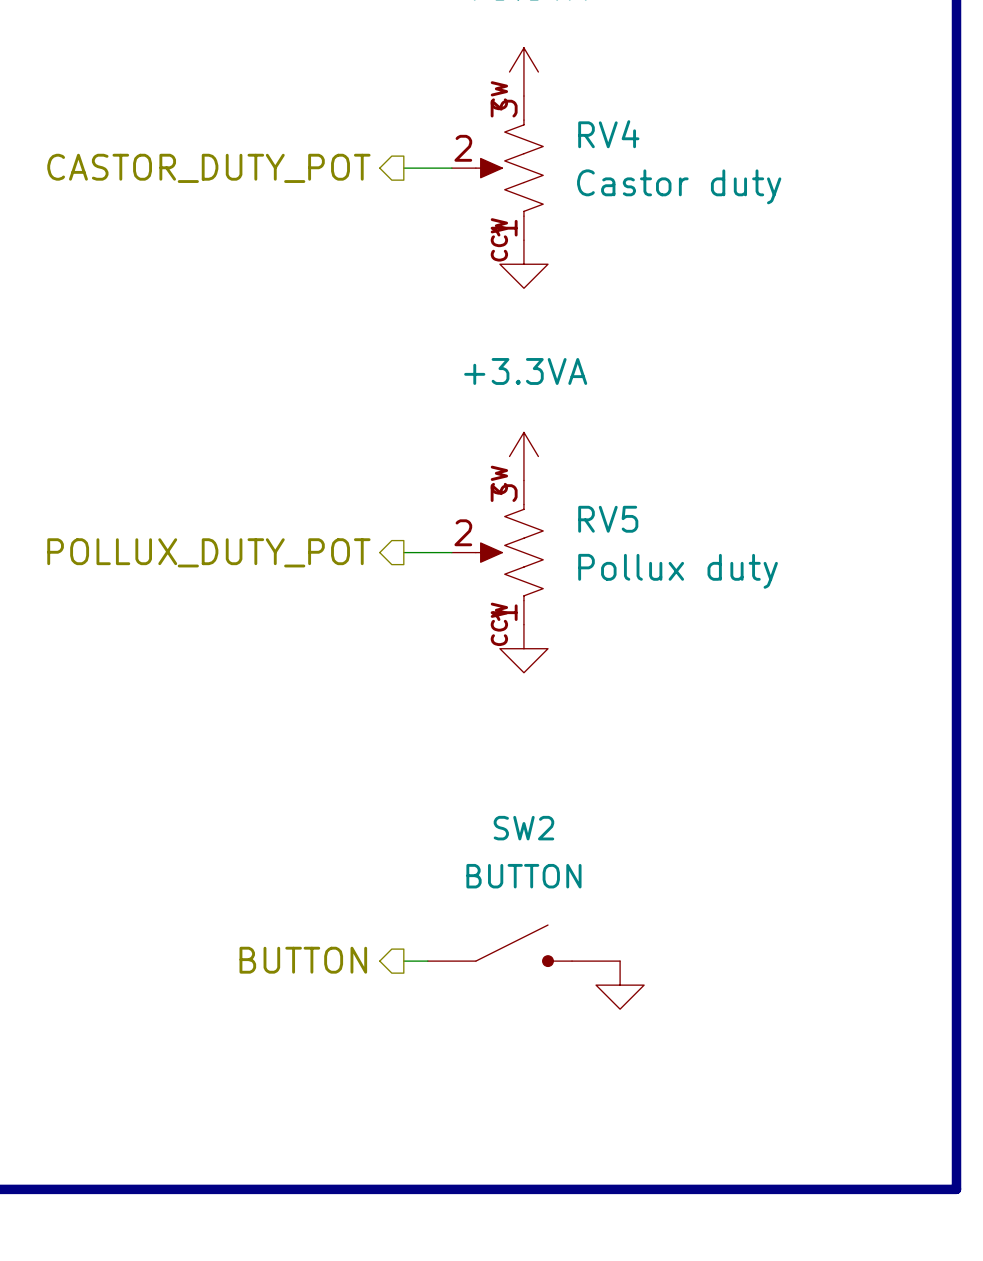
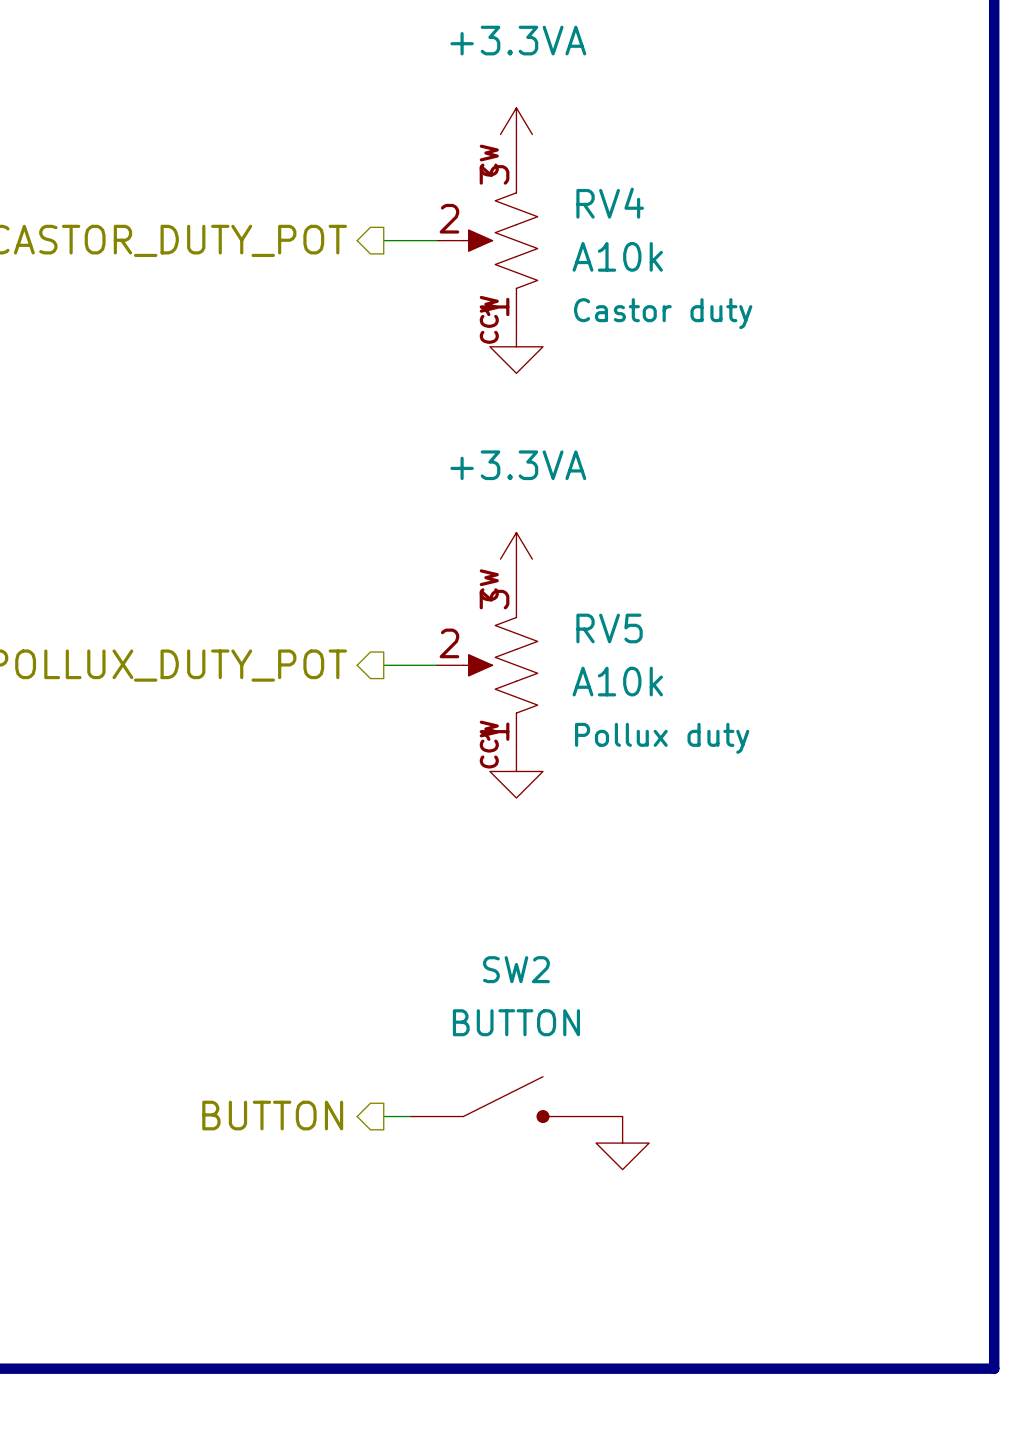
RV4 value: Castor duty (679, 186) -> A10k (617, 256)
RV4 text: none -> Castor duty (663, 313)
RV5 value: Pollux duty (678, 571) -> A10k (617, 681)
RV5 text: none -> Pollux duty (662, 738)

